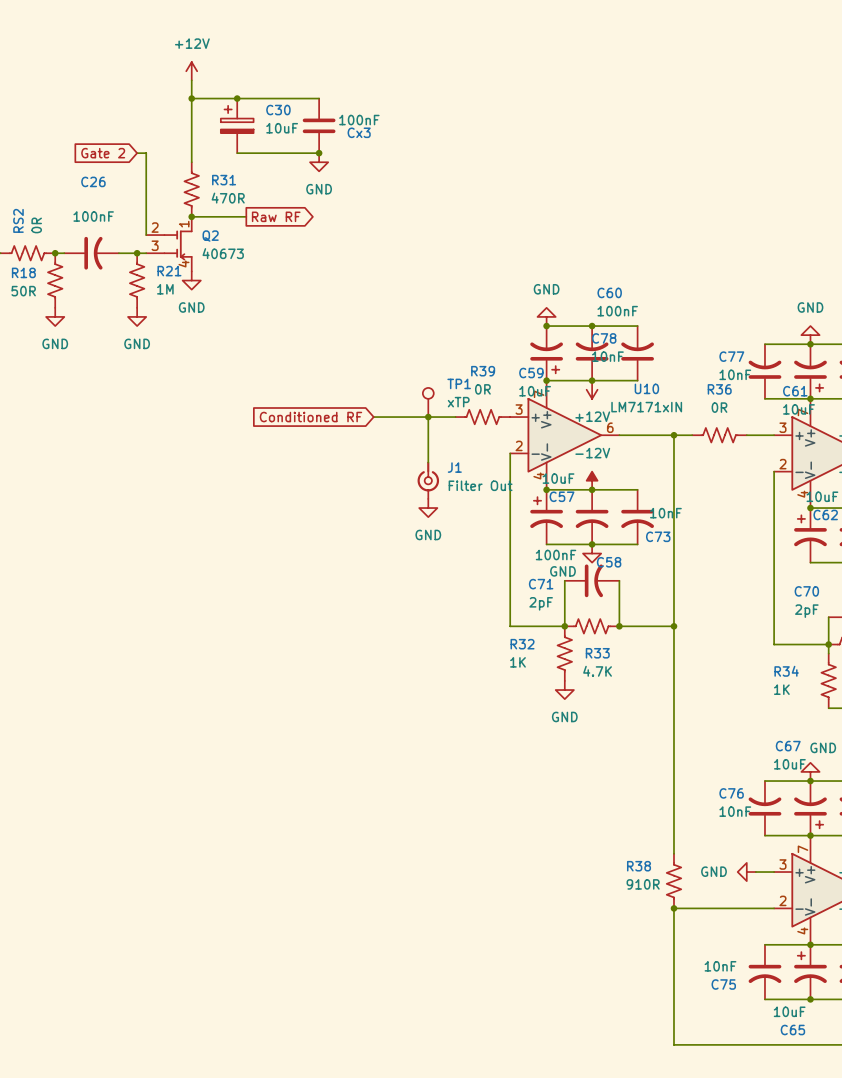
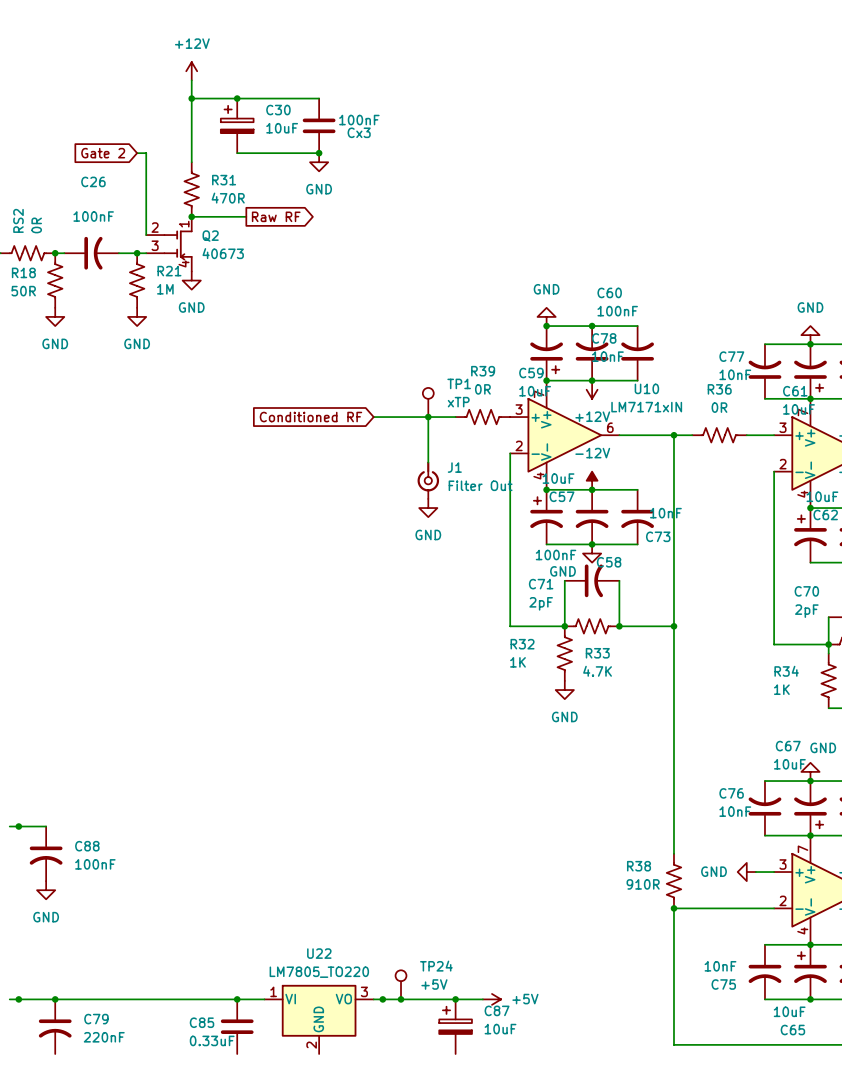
wire: none -> (9, 826) (46, 826)
junction: none -> (18, 826)
C88: none -> 100nF (46, 853)
power symbol: none -> GND (46, 890)
TP24: none -> +5V (401, 984)
wire: none -> (9, 999) (264, 999)
junction: none -> (18, 999)
junction: none -> (55, 999)
junction: none -> (237, 999)
wire: none -> (373, 999) (482, 999)
junction: none -> (382, 999)
junction: none -> (401, 999)
junction: none -> (455, 999)
power symbol: none -> +5V (492, 999)
U22: none -> LM7805_TO220 (319, 1019)
C79: none -> 220nF (55, 1026)
C85: none -> 0.33uF (237, 1026)
C87: none -> 10uF (455, 1026)

